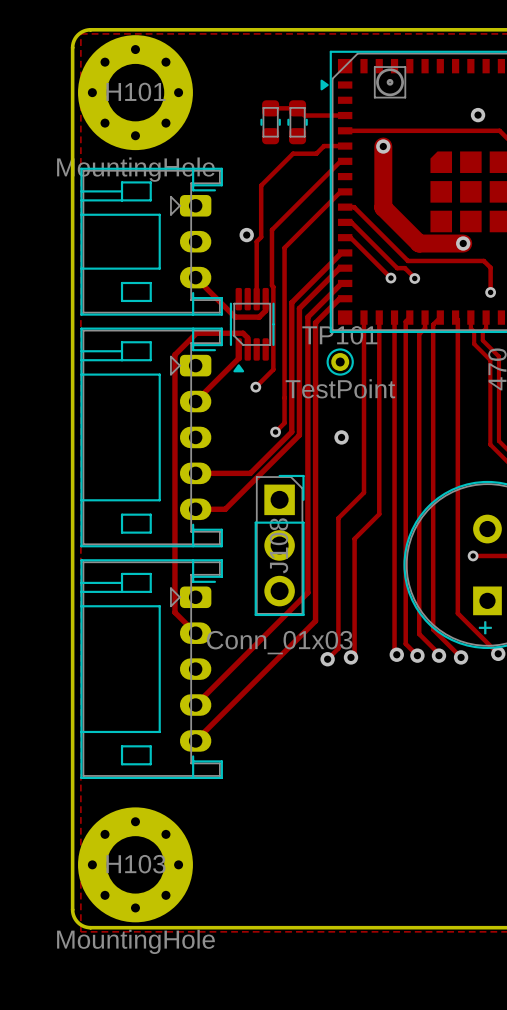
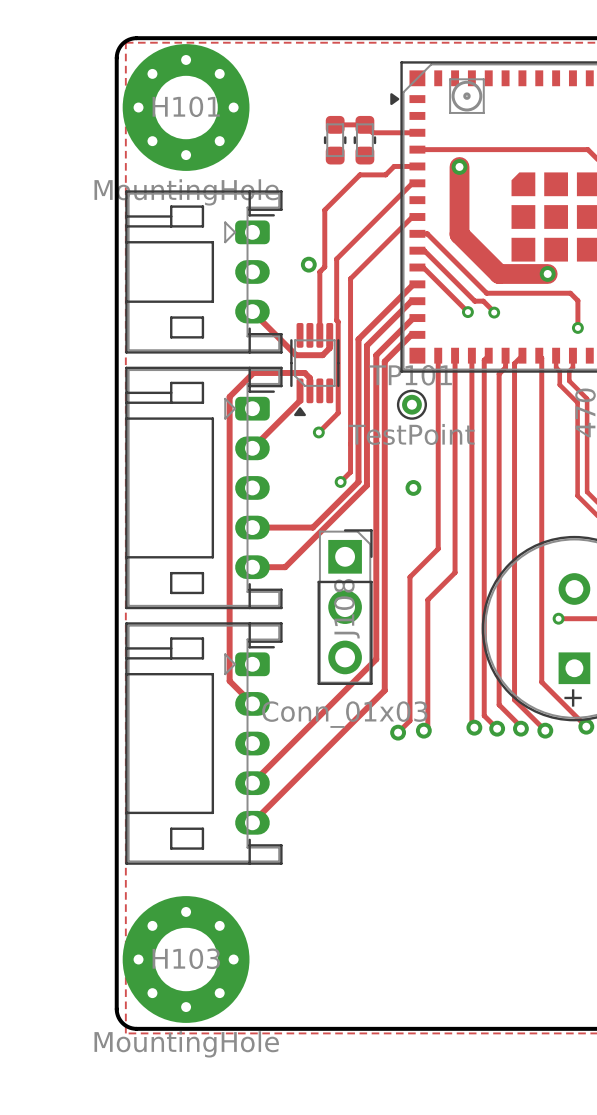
via: (478, 115) -> none

